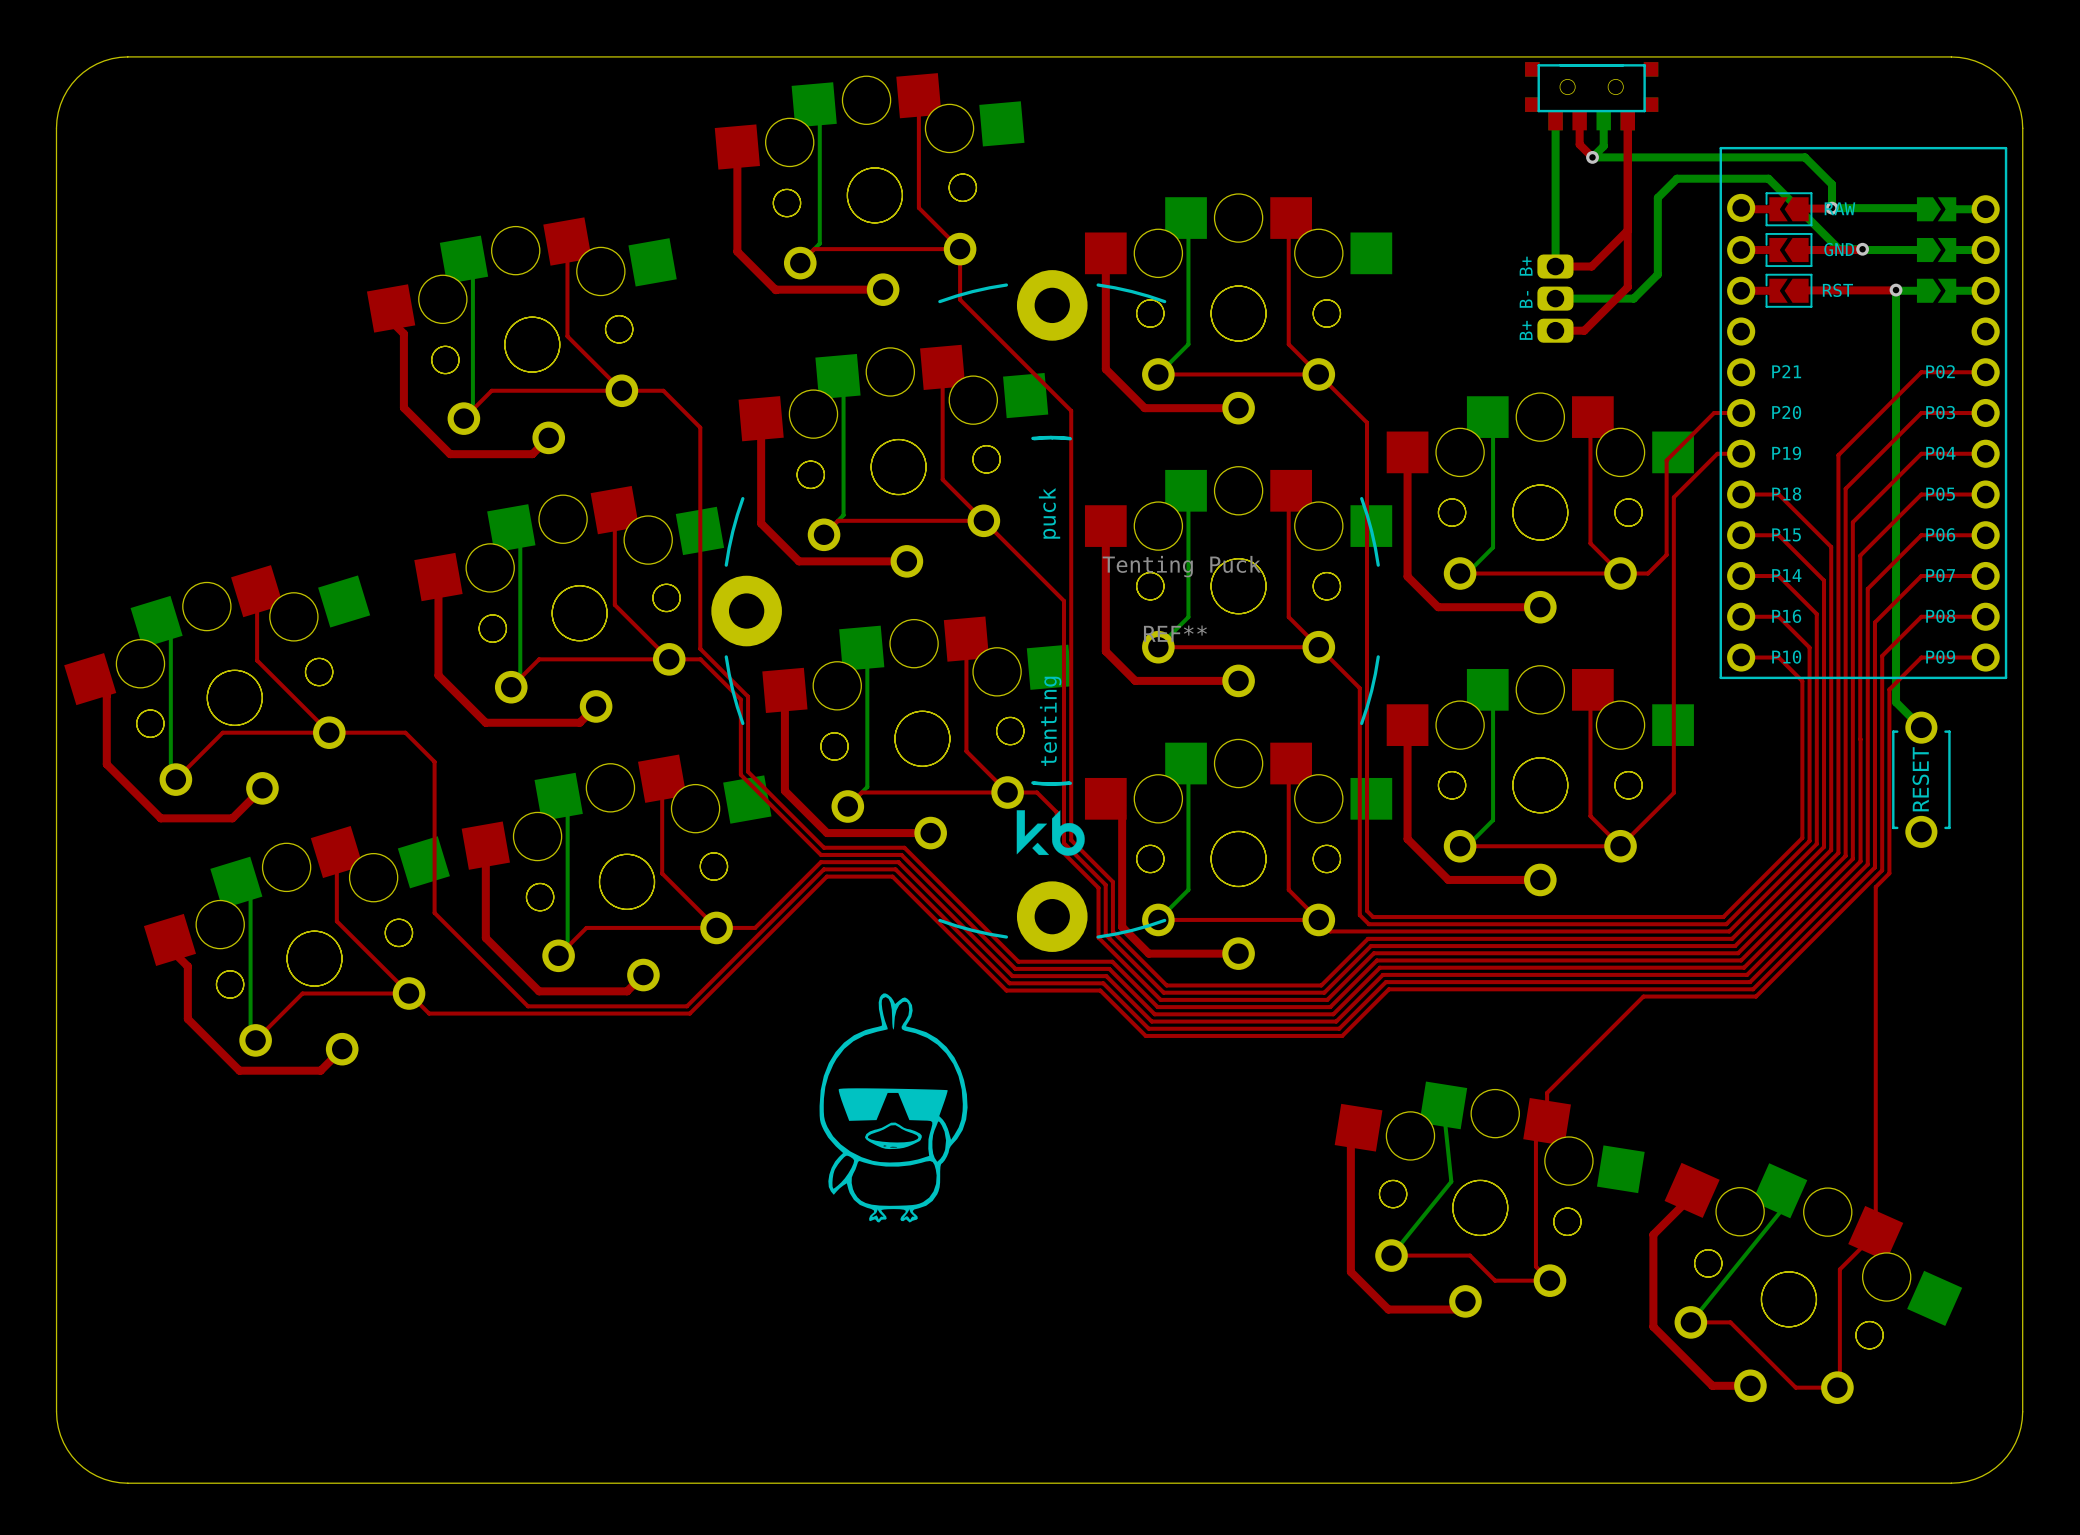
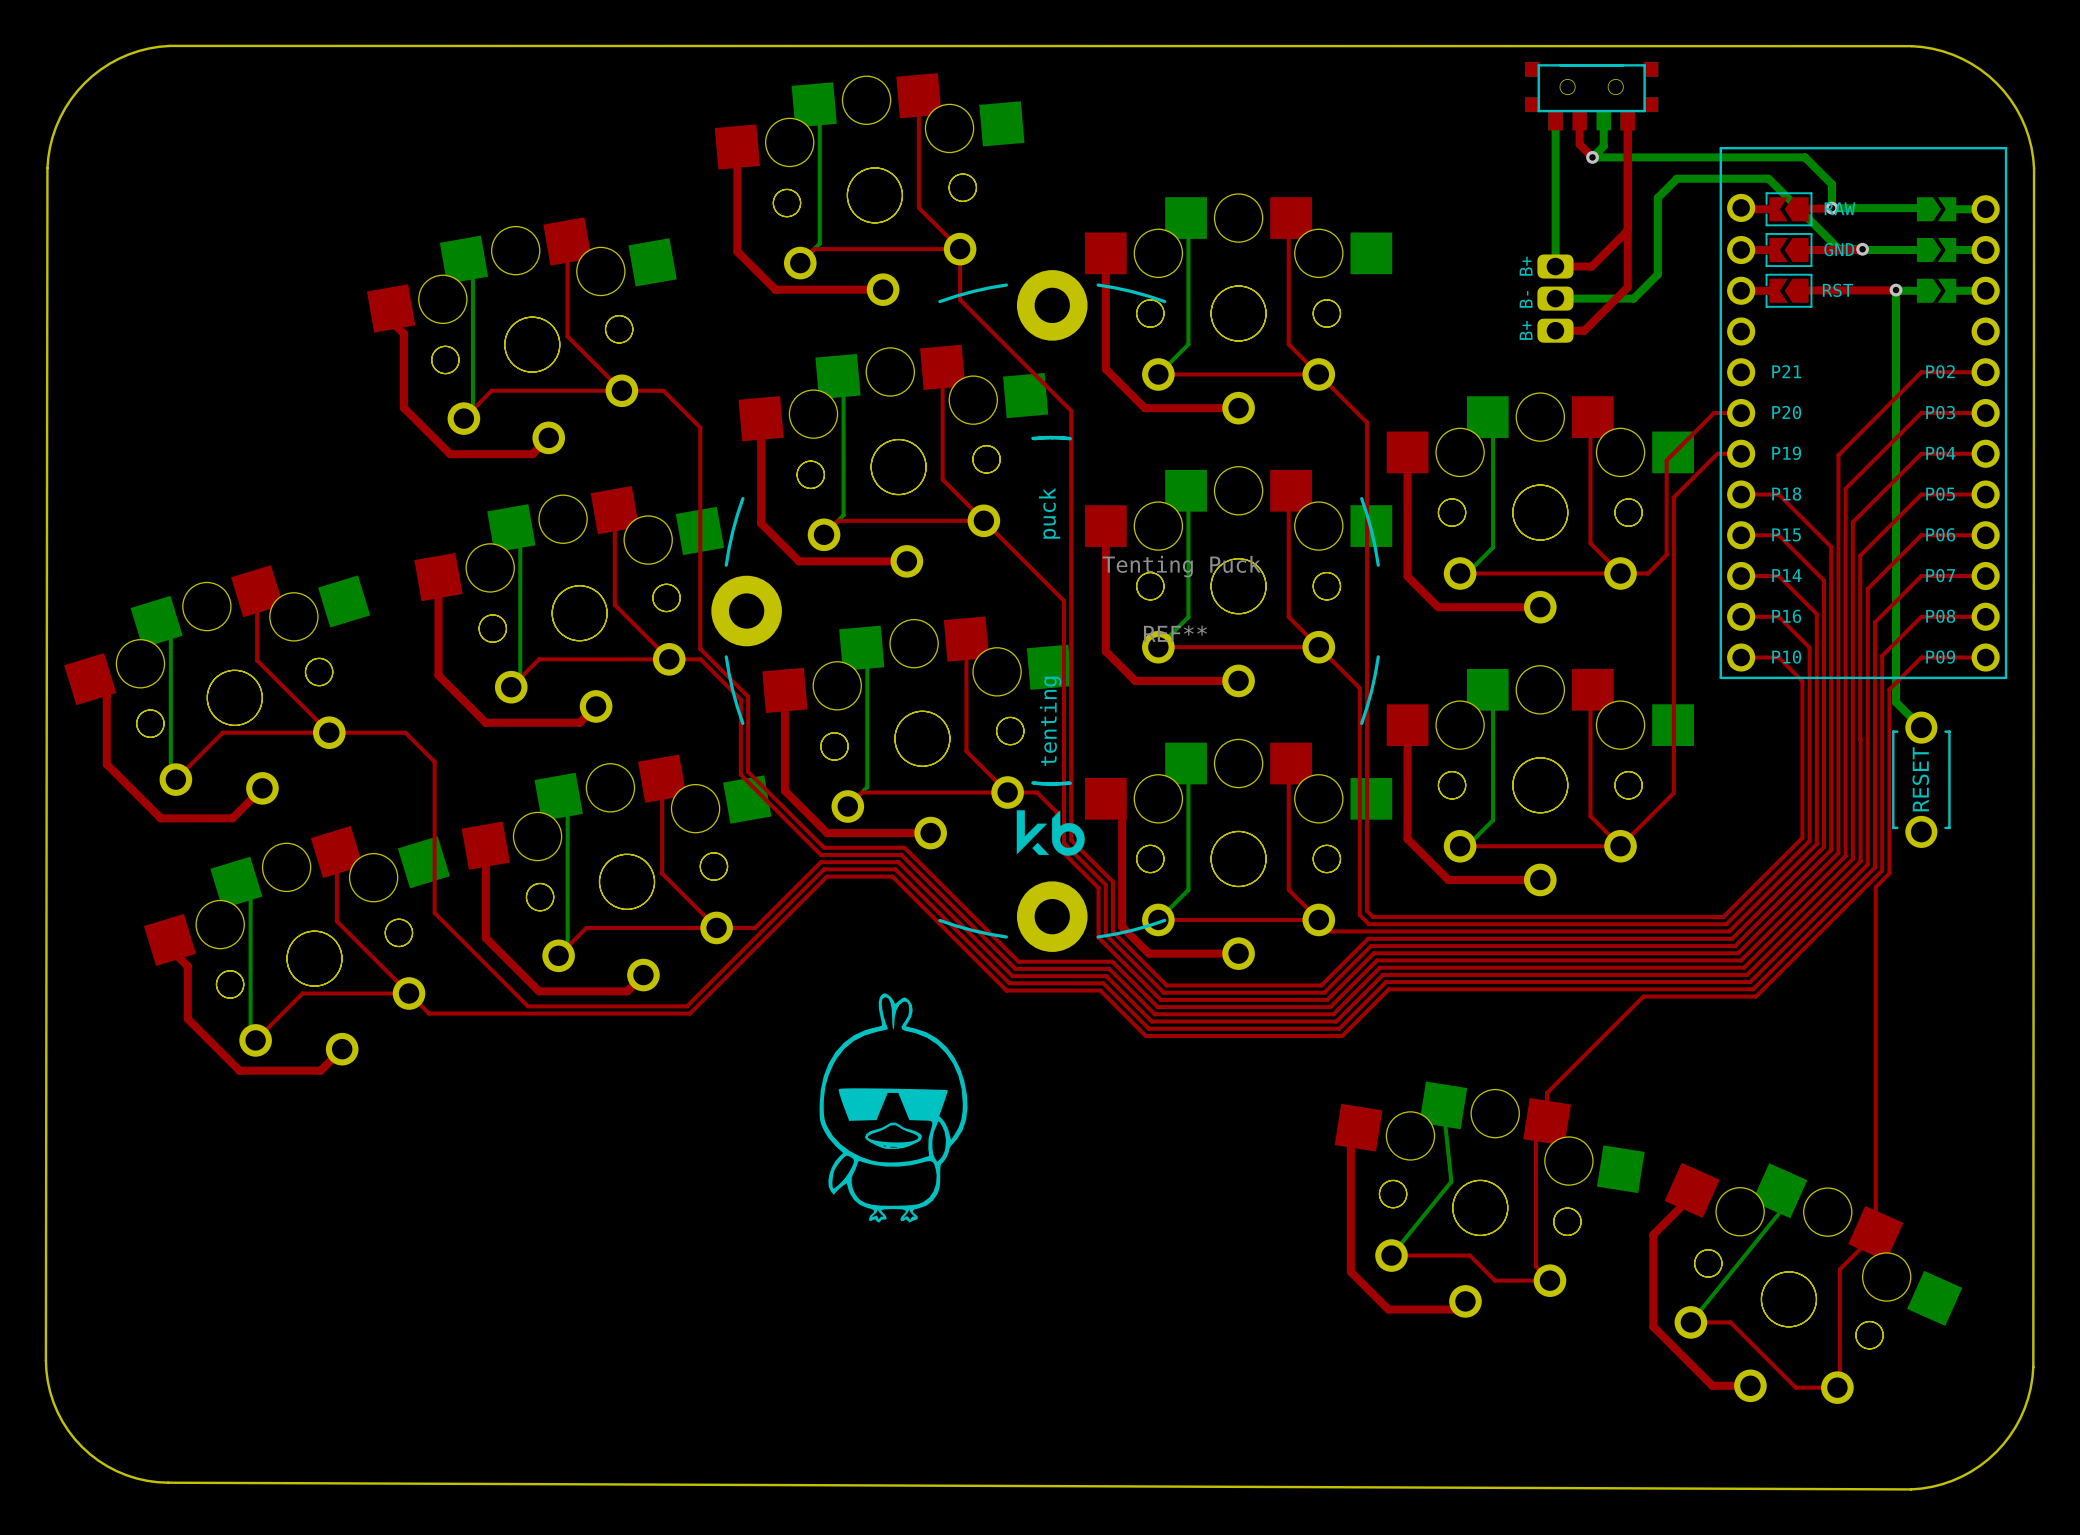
board edge: (127, 56) (1951, 56) (1974, 60) (1995, 72) (2007, 83) (2015, 97) (2020, 112) (2022, 128) (2022, 1411) (2018, 1435) (2007, 1456) (1995, 1467) (1982, 1476) (1967, 1481) (1951, 1483) (127, 1483) (104, 1479) (83, 1467) (72, 1456) (63, 1442) (58, 1427) (56, 1411) (56, 128) (58, 112) (63, 97) (77, 77) (96, 63) (111, 58) (127, 56) -> (169, 45) (138, 51) (118, 58) (100, 69) (84, 83) (71, 99) (60, 117) (52, 137) (47, 168) (45, 1360) (50, 1392) (62, 1421) (74, 1438) (98, 1460) (116, 1471) (136, 1478) (168, 1482) (1911, 1489) (1942, 1484) (1971, 1471) (1996, 1452) (2009, 1436) (2020, 1417) (2028, 1398) (2033, 1367) (2034, 168) (2031, 147) (2021, 117) (2003, 91) (1980, 69) (1952, 54) (1932, 48) (1911, 46) (169, 45)

